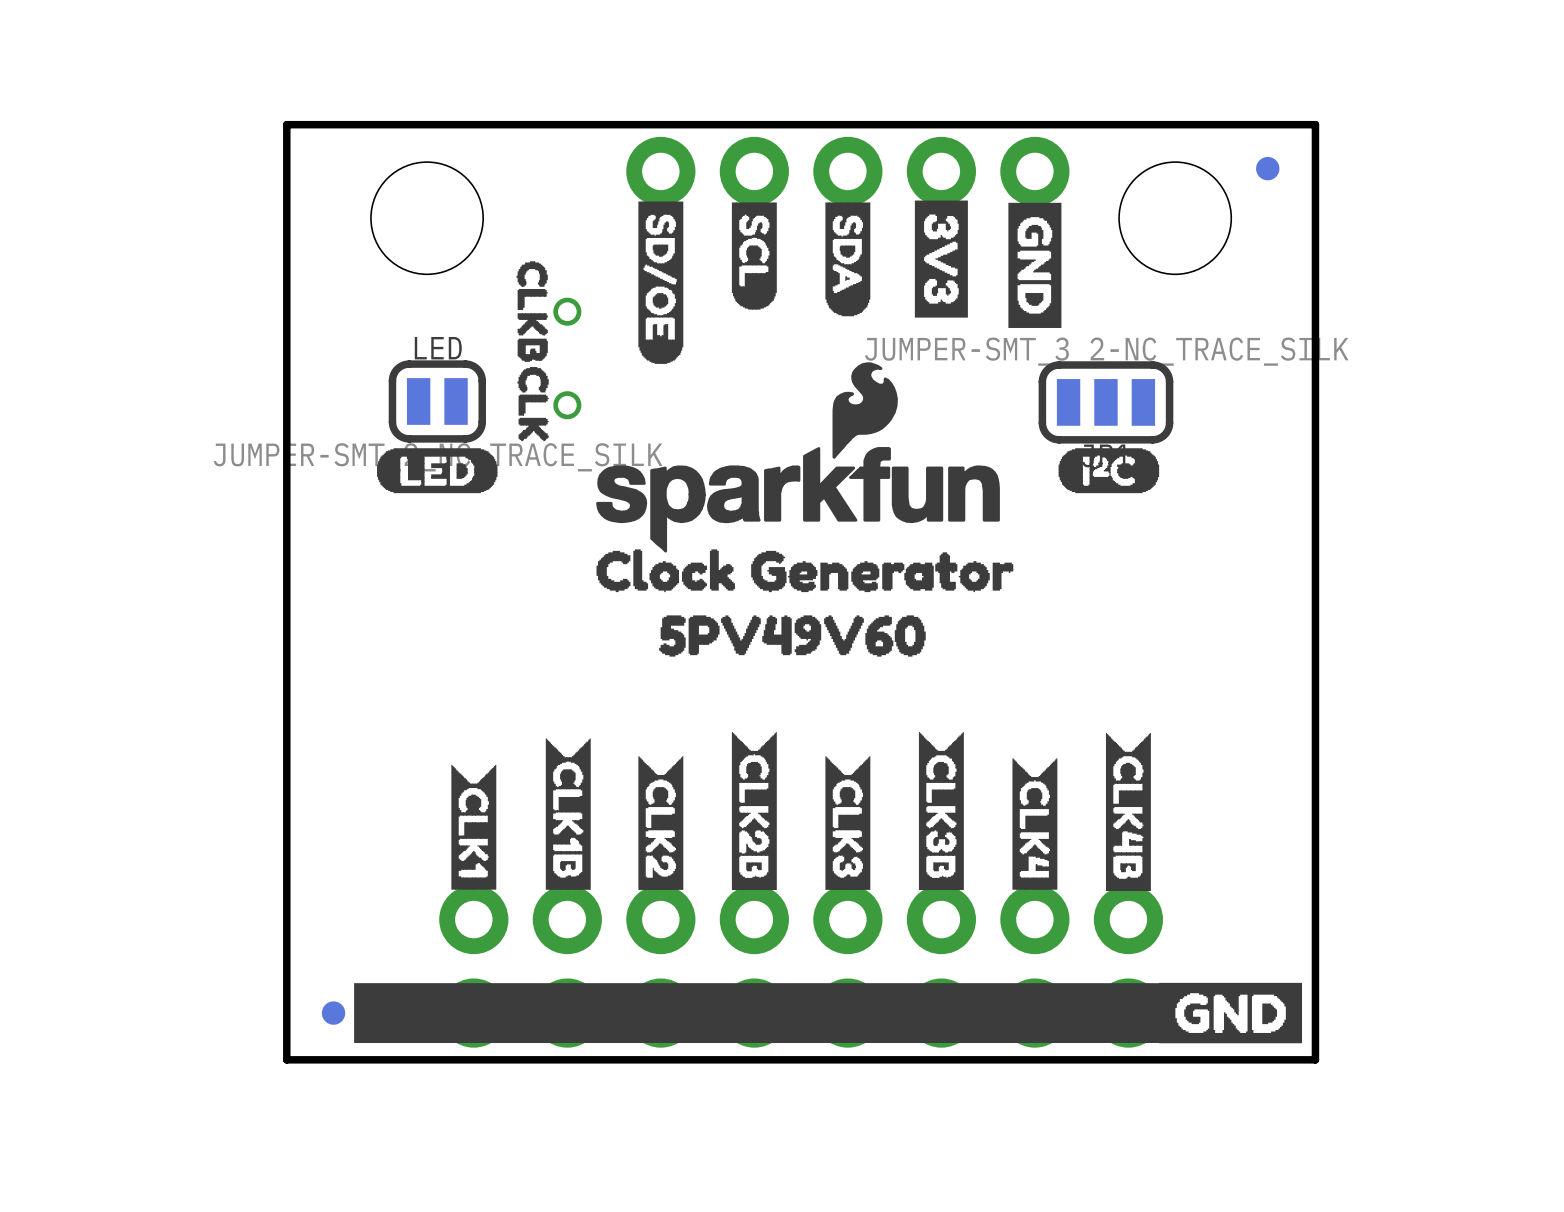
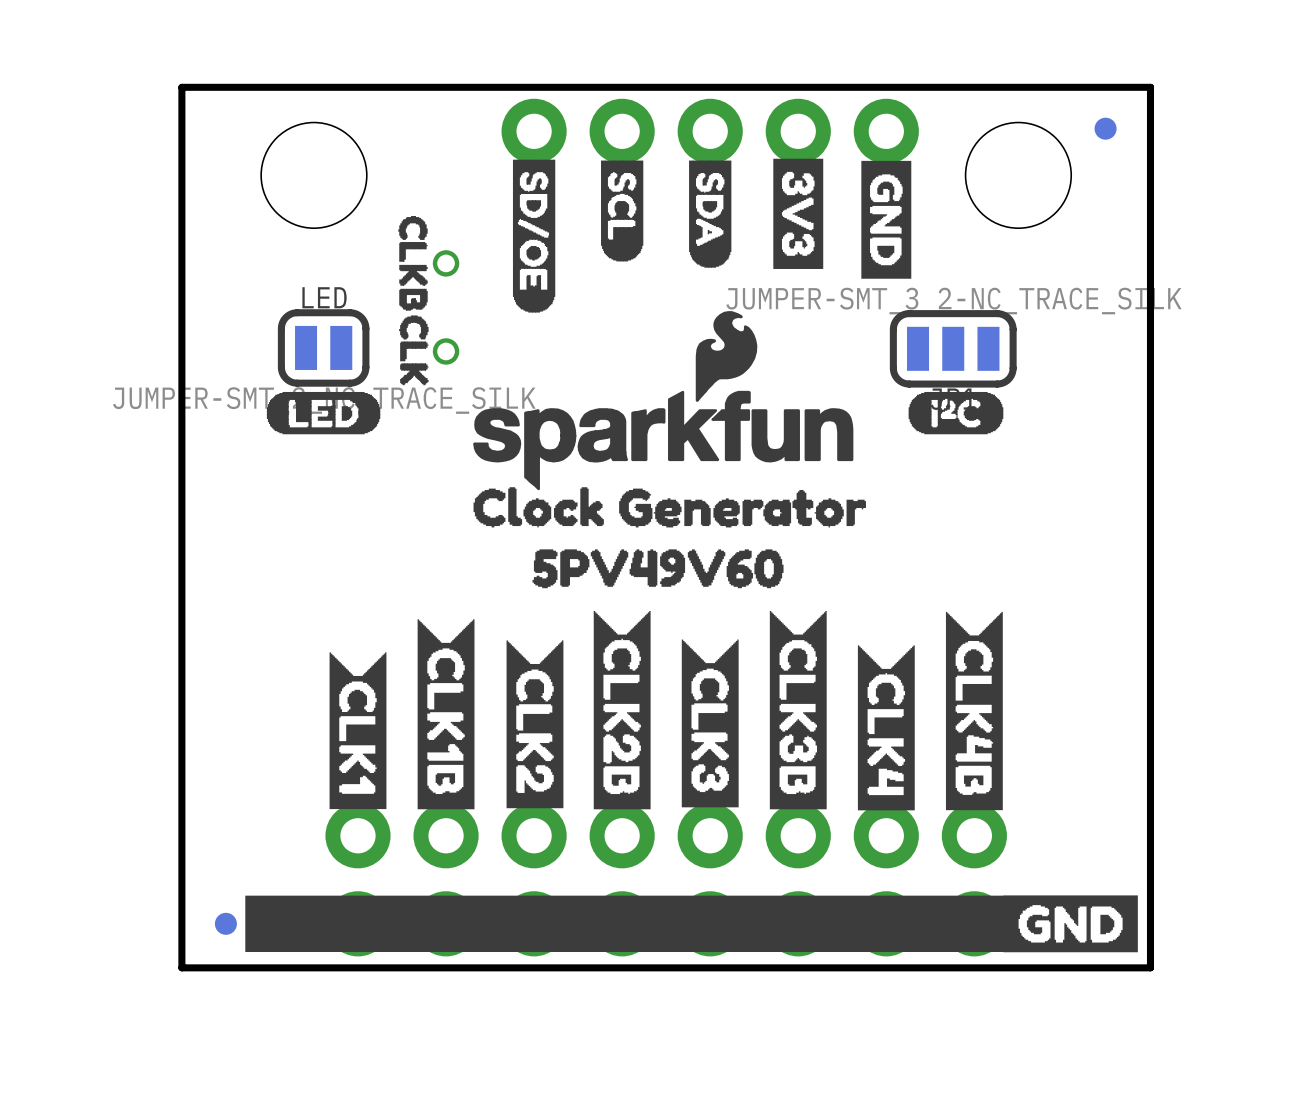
drawing shape: [731, 732, 777, 891] -> [593, 610, 651, 810]
drawing shape: [918, 732, 964, 891] -> [769, 610, 827, 810]
drawing shape: [1105, 733, 1151, 891] -> [945, 611, 1003, 811]
drawing shape: [545, 738, 591, 890] -> [417, 619, 475, 810]
drawing shape: [638, 756, 684, 890] -> [506, 640, 564, 809]
drawing shape: [825, 756, 871, 890] -> [681, 639, 739, 808]
drawing shape: [1012, 758, 1058, 890] -> [857, 645, 915, 811]
drawing shape: [451, 764, 497, 890] -> [329, 652, 387, 810]

